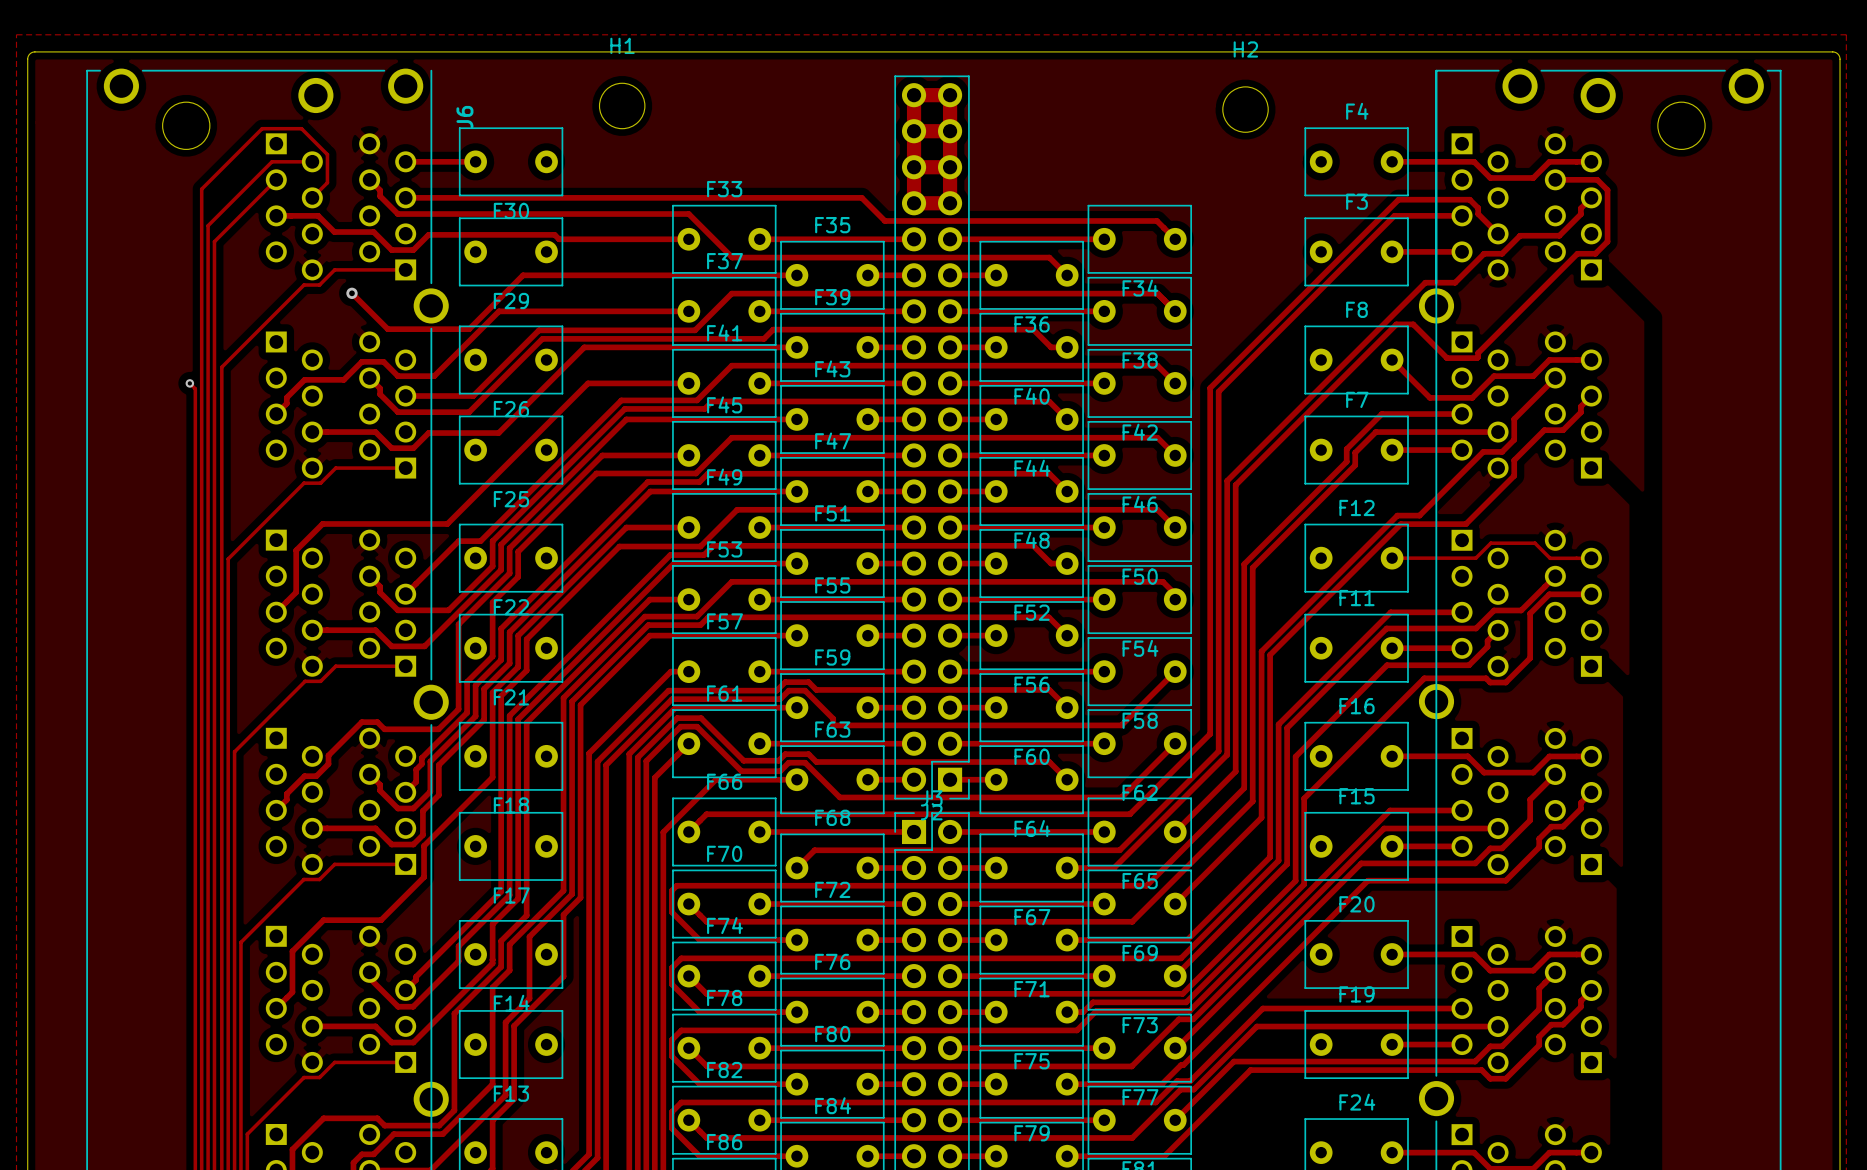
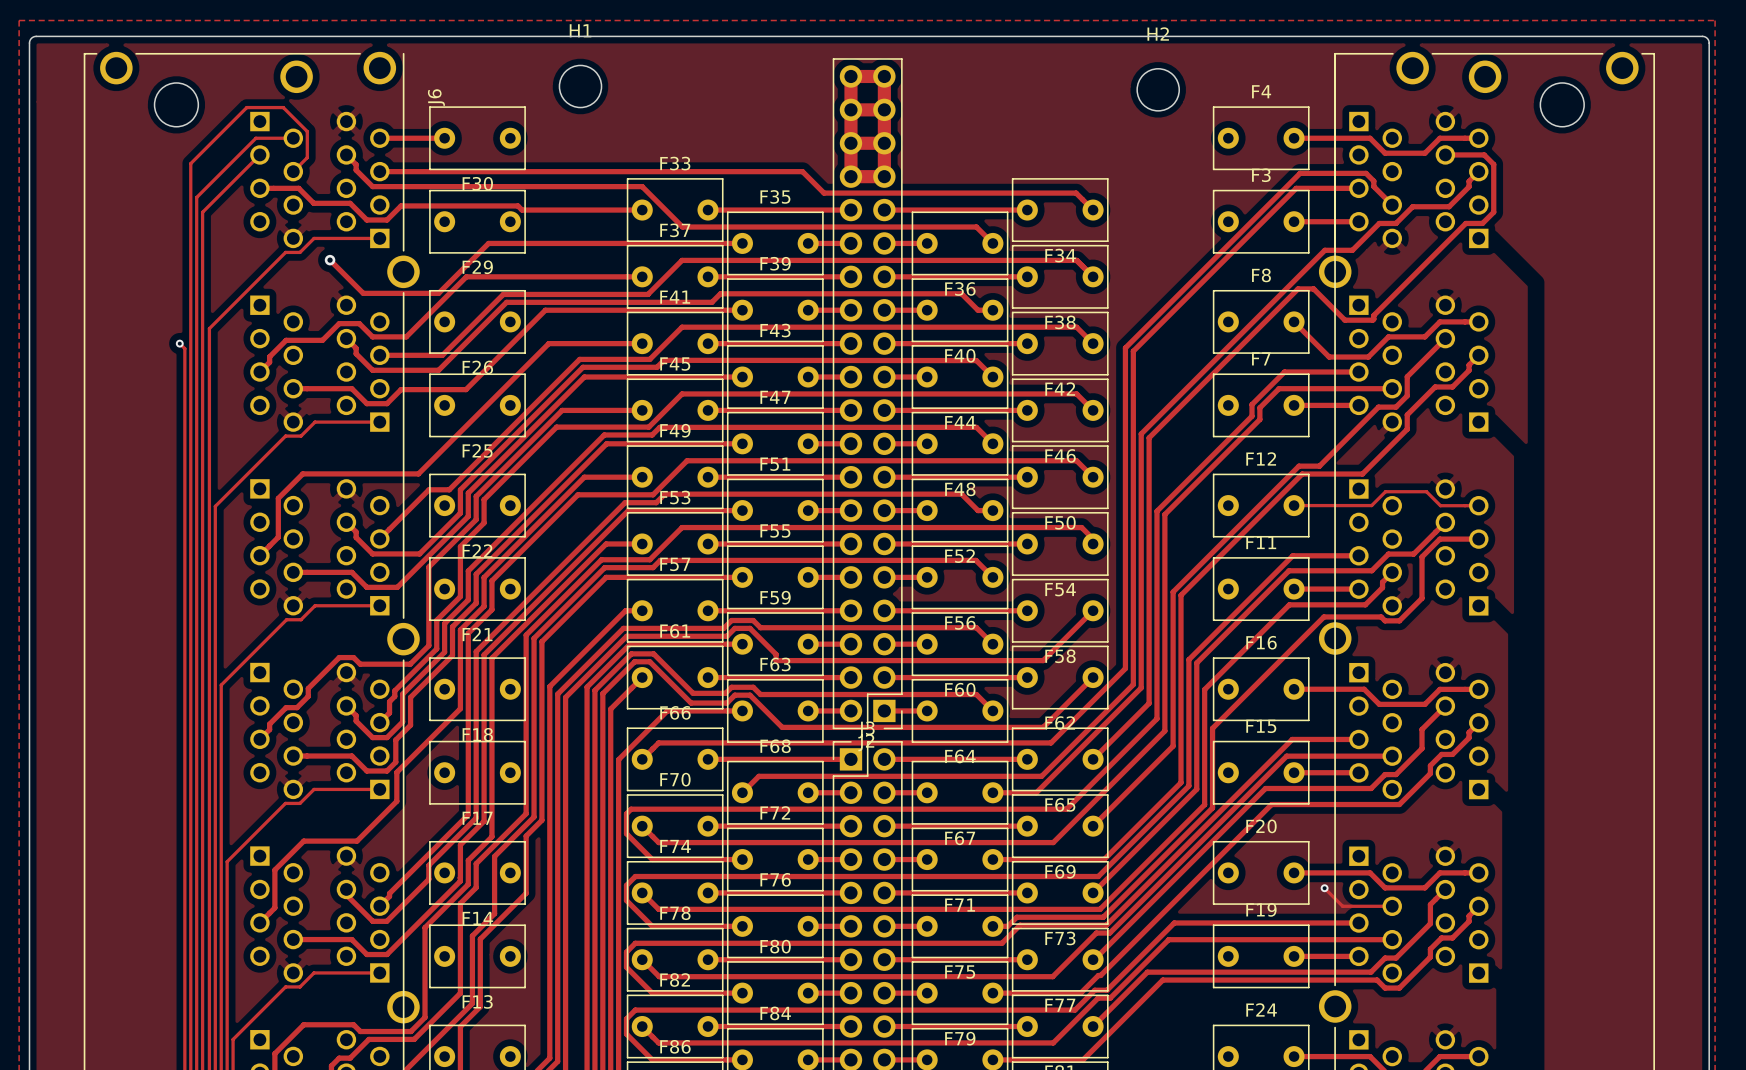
track: none -> (1324, 888) (1342, 906) (1392, 906)
via: none -> (1324, 888)

